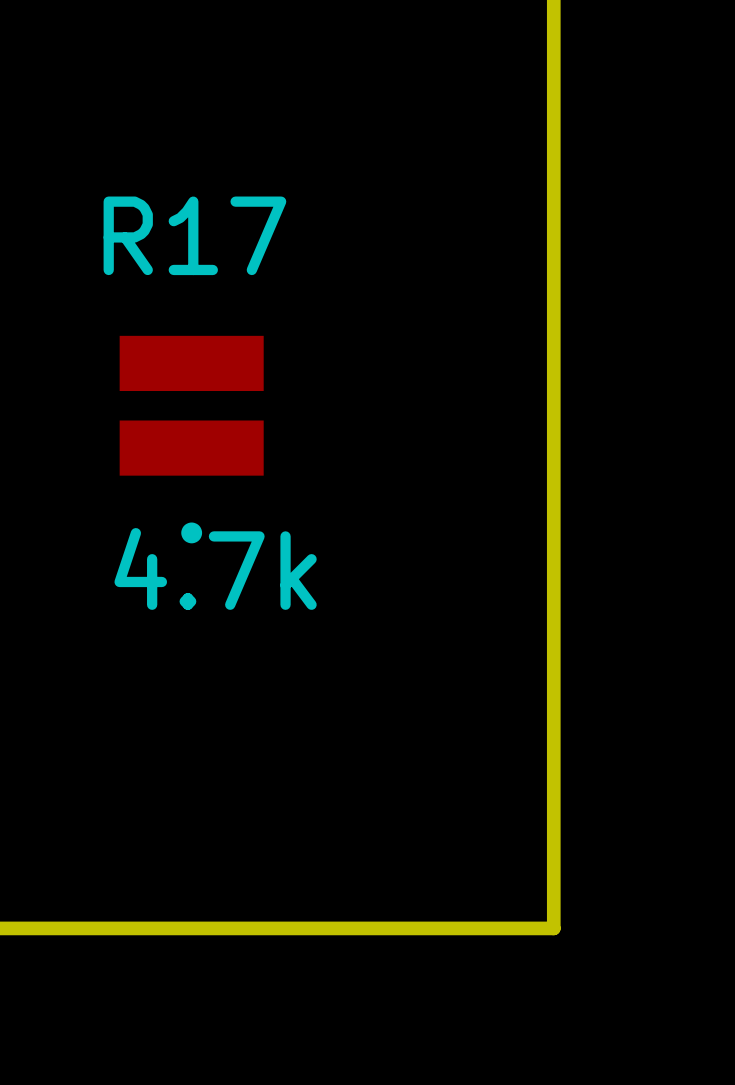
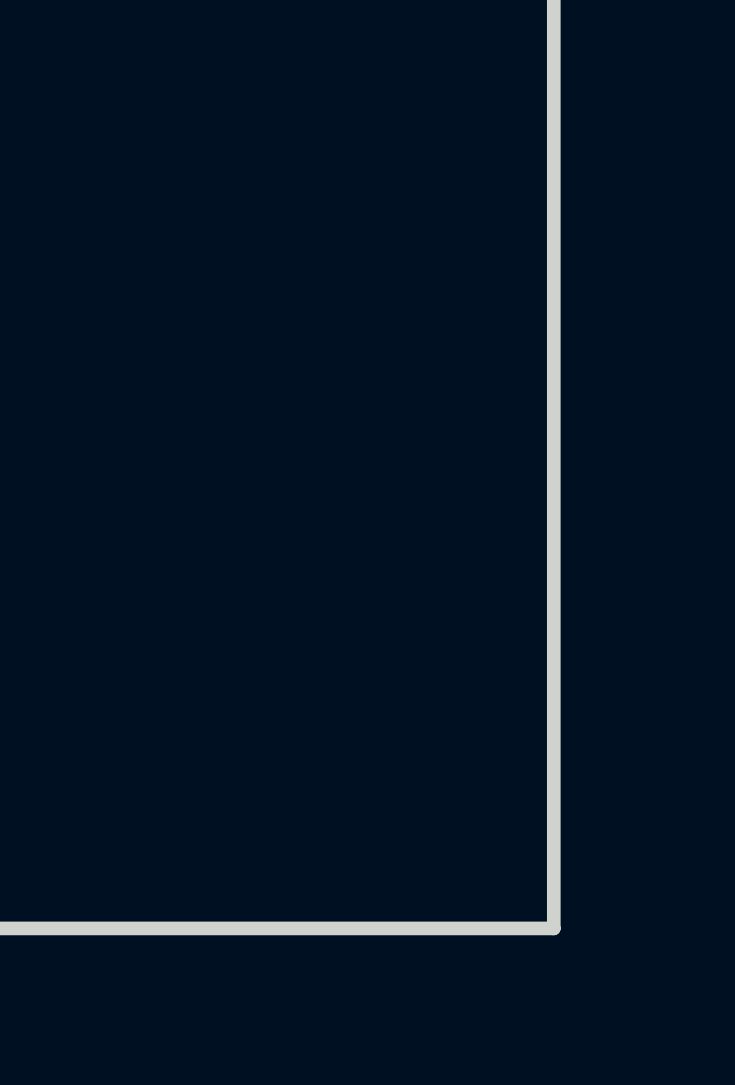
R17: 4.7k (191, 439) -> none

